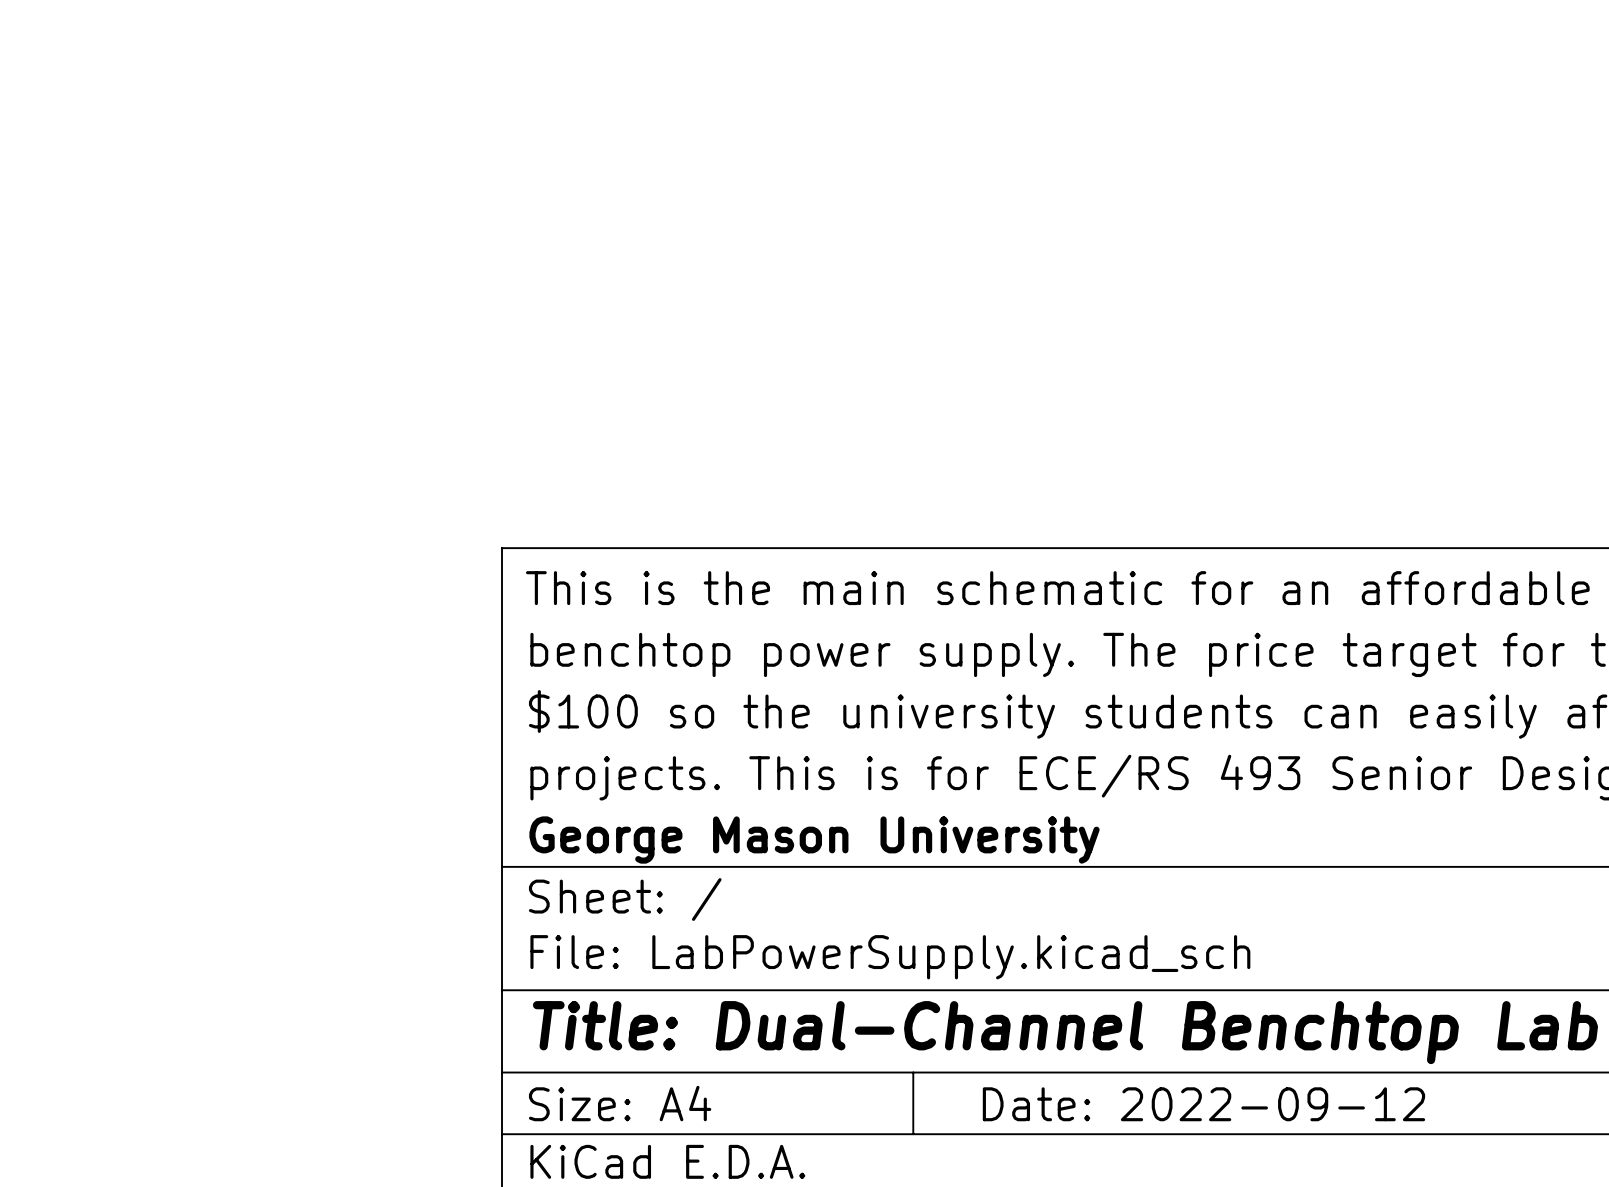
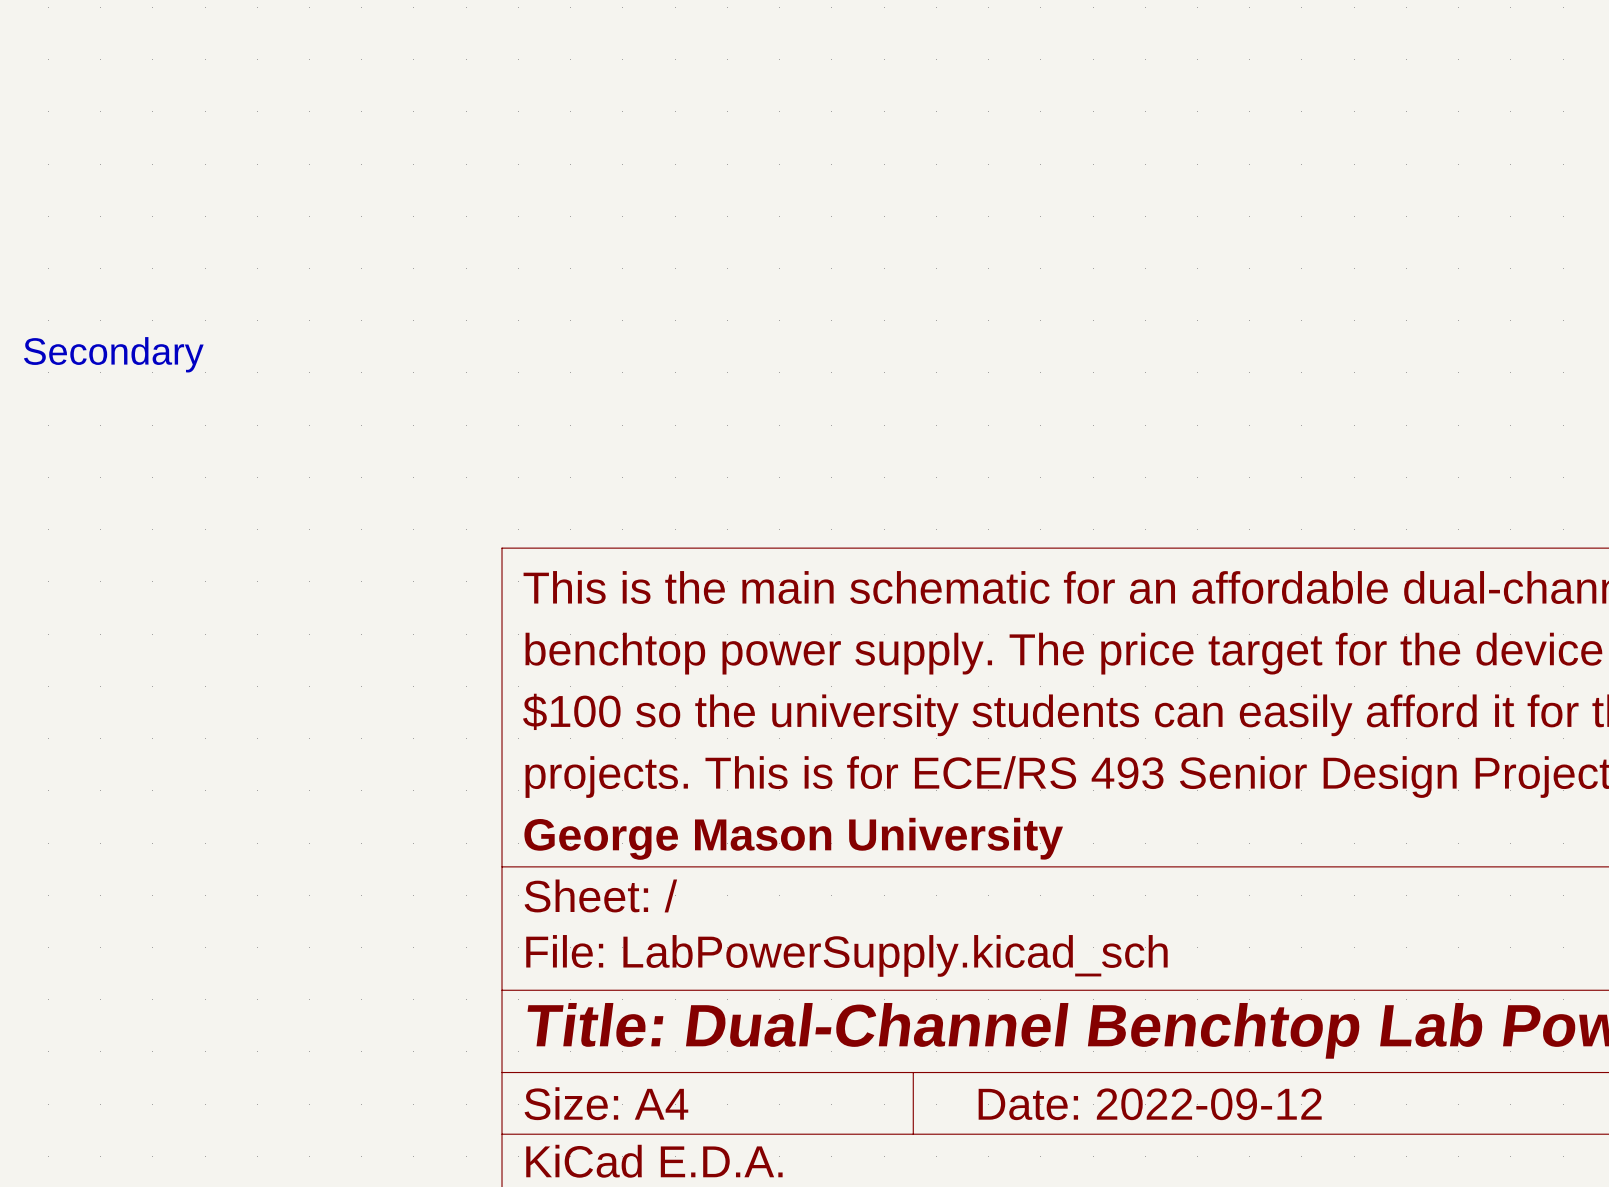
text: none -> Secondary (113, 354)

